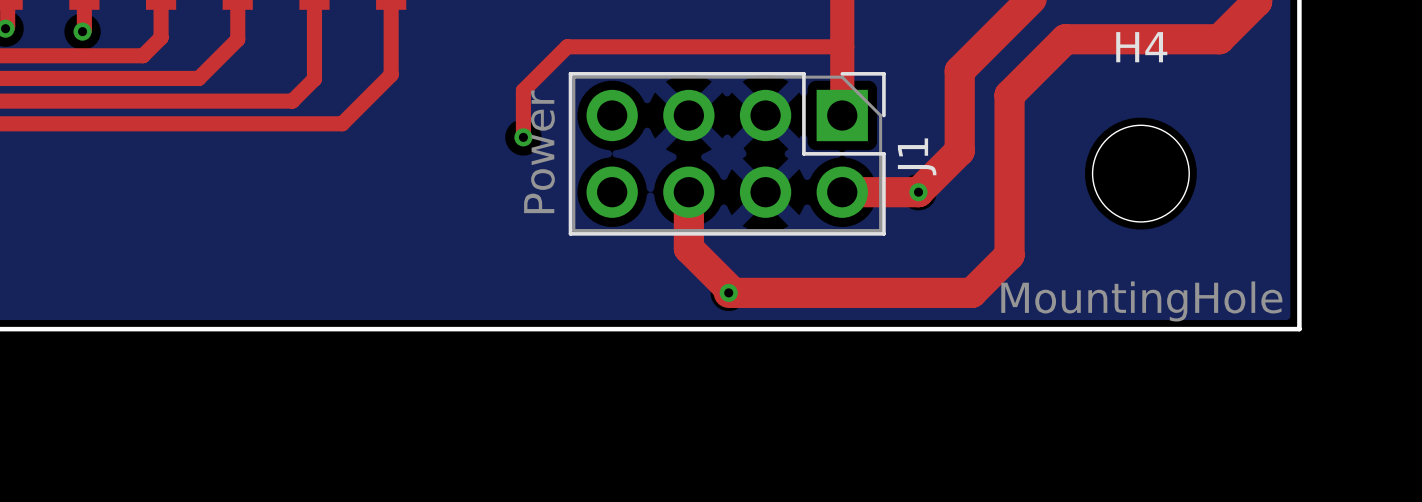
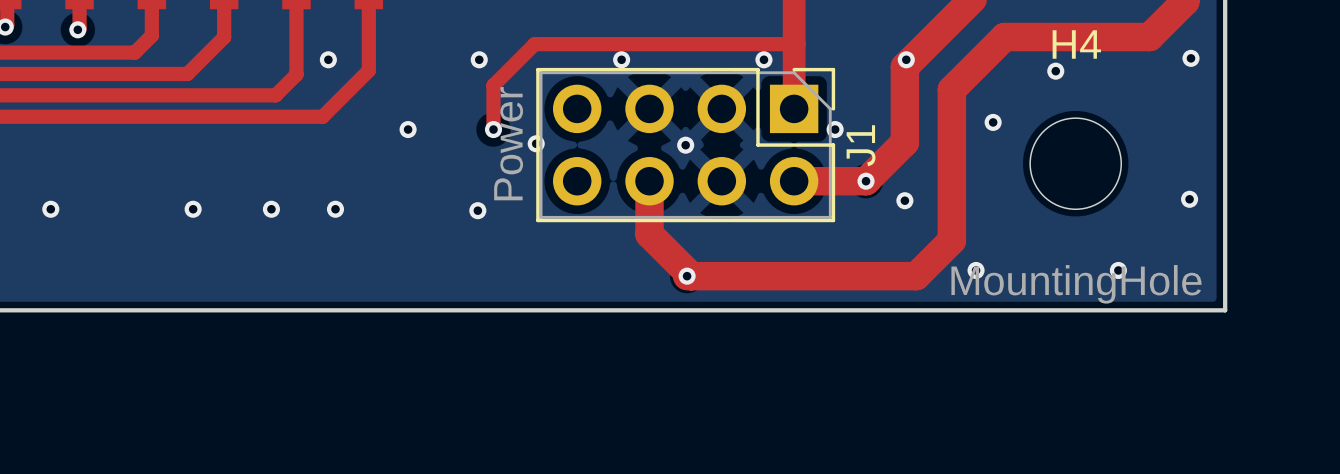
via: none -> (1191, 58)
via: none -> (328, 59)
via: none -> (479, 59)
via: none -> (621, 59)
via: none -> (763, 59)
via: none -> (906, 59)
via: none -> (1055, 71)
via: none -> (993, 122)
via: none -> (408, 129)
via: none -> (835, 129)
via: none -> (536, 143)
via: none -> (685, 145)
via: none -> (1189, 199)
via: none -> (904, 200)
via: none -> (50, 209)
via: none -> (193, 209)
via: none -> (271, 209)
via: none -> (335, 209)
via: none -> (477, 210)
via: none -> (976, 270)
via: none -> (1118, 270)

